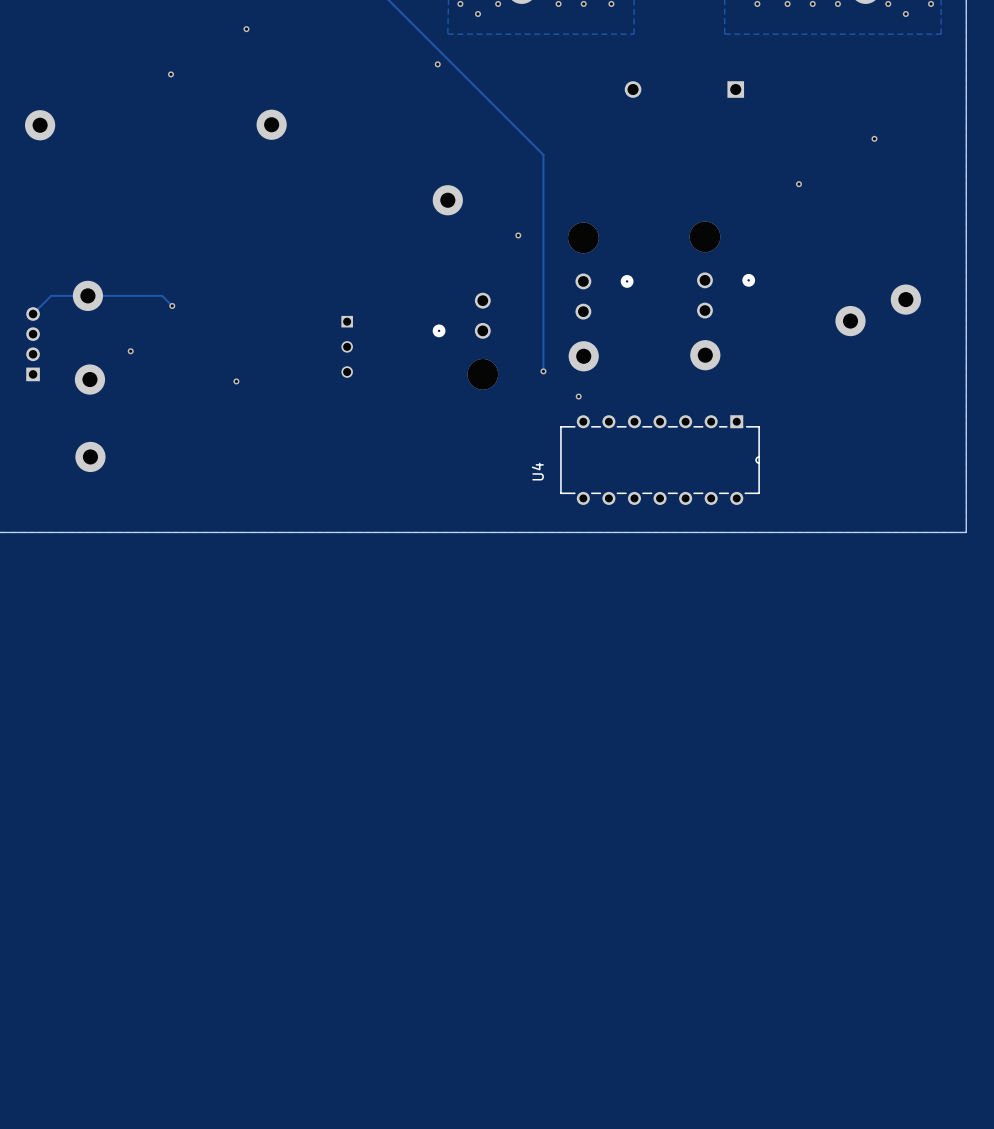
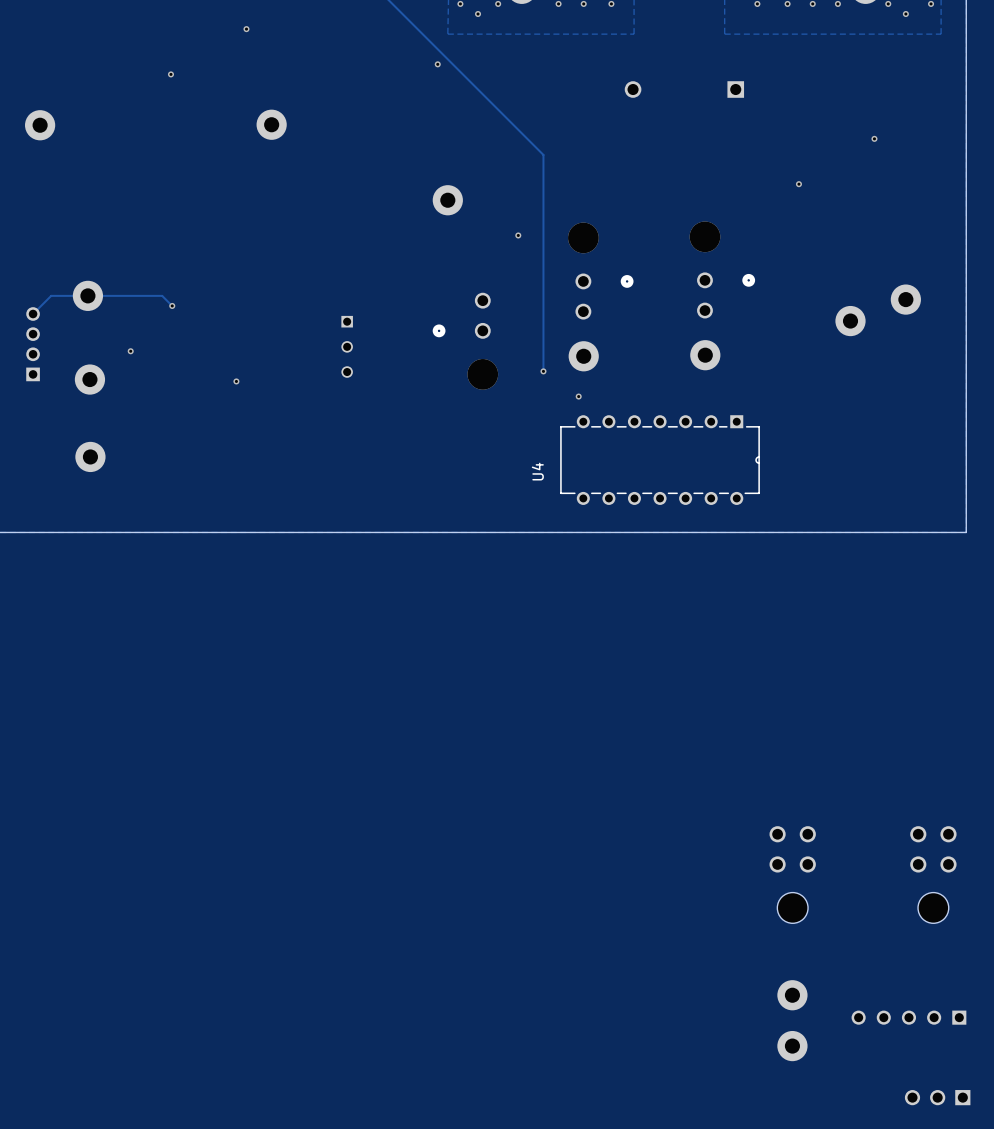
part: none -> (792, 874)
part: none -> (933, 874)
part: none -> (792, 995)
part: none -> (908, 1017)
part: none -> (792, 1046)
part: none -> (937, 1097)

